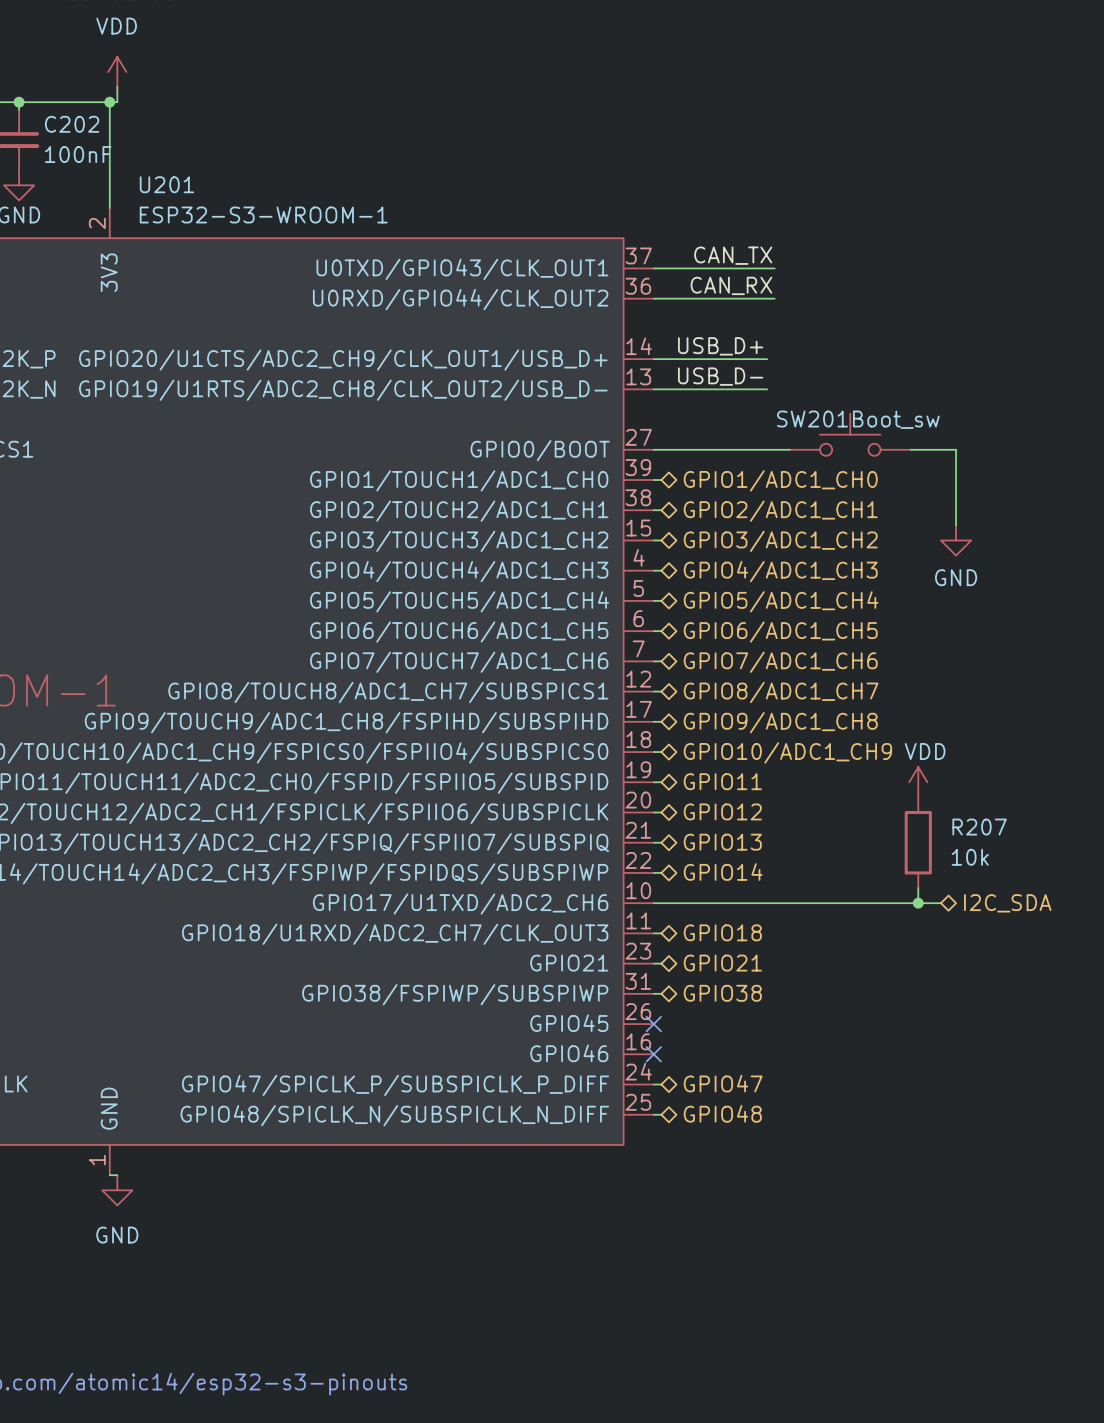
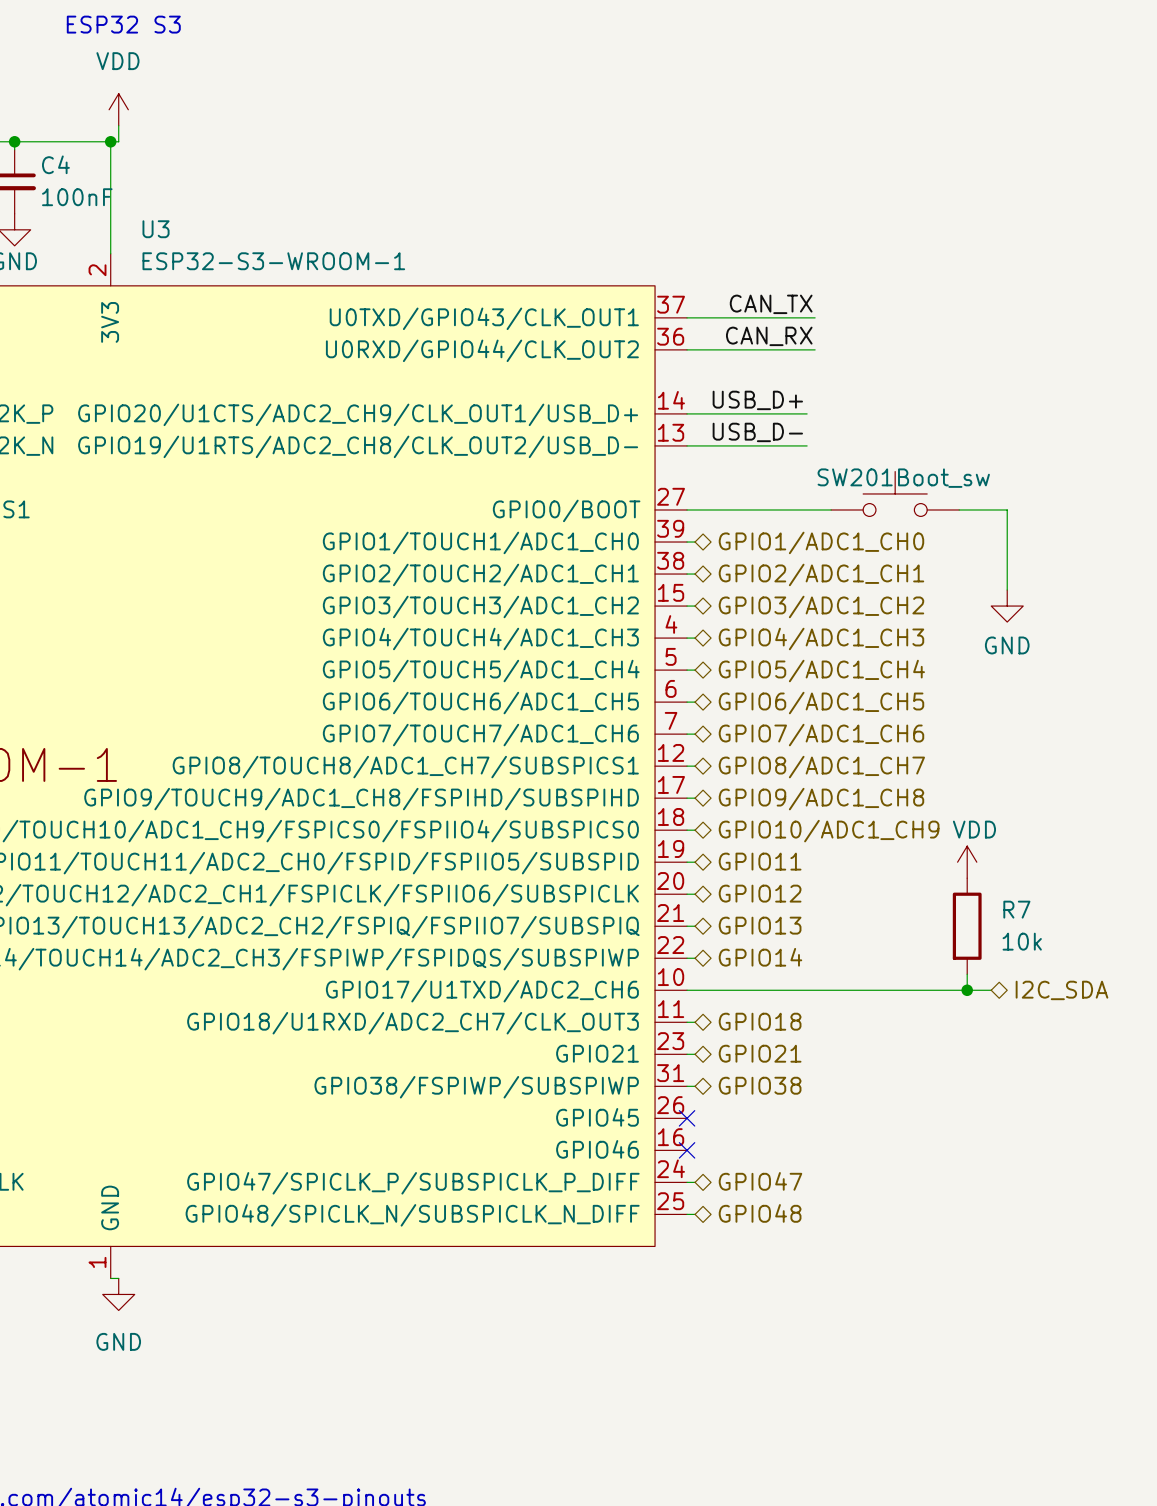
C202 name: C202 (72, 124) -> C4 (55, 164)
U201 name: U201 (166, 184) -> U3 (156, 229)
R207 name: R207 (979, 827) -> R7 (1016, 909)

